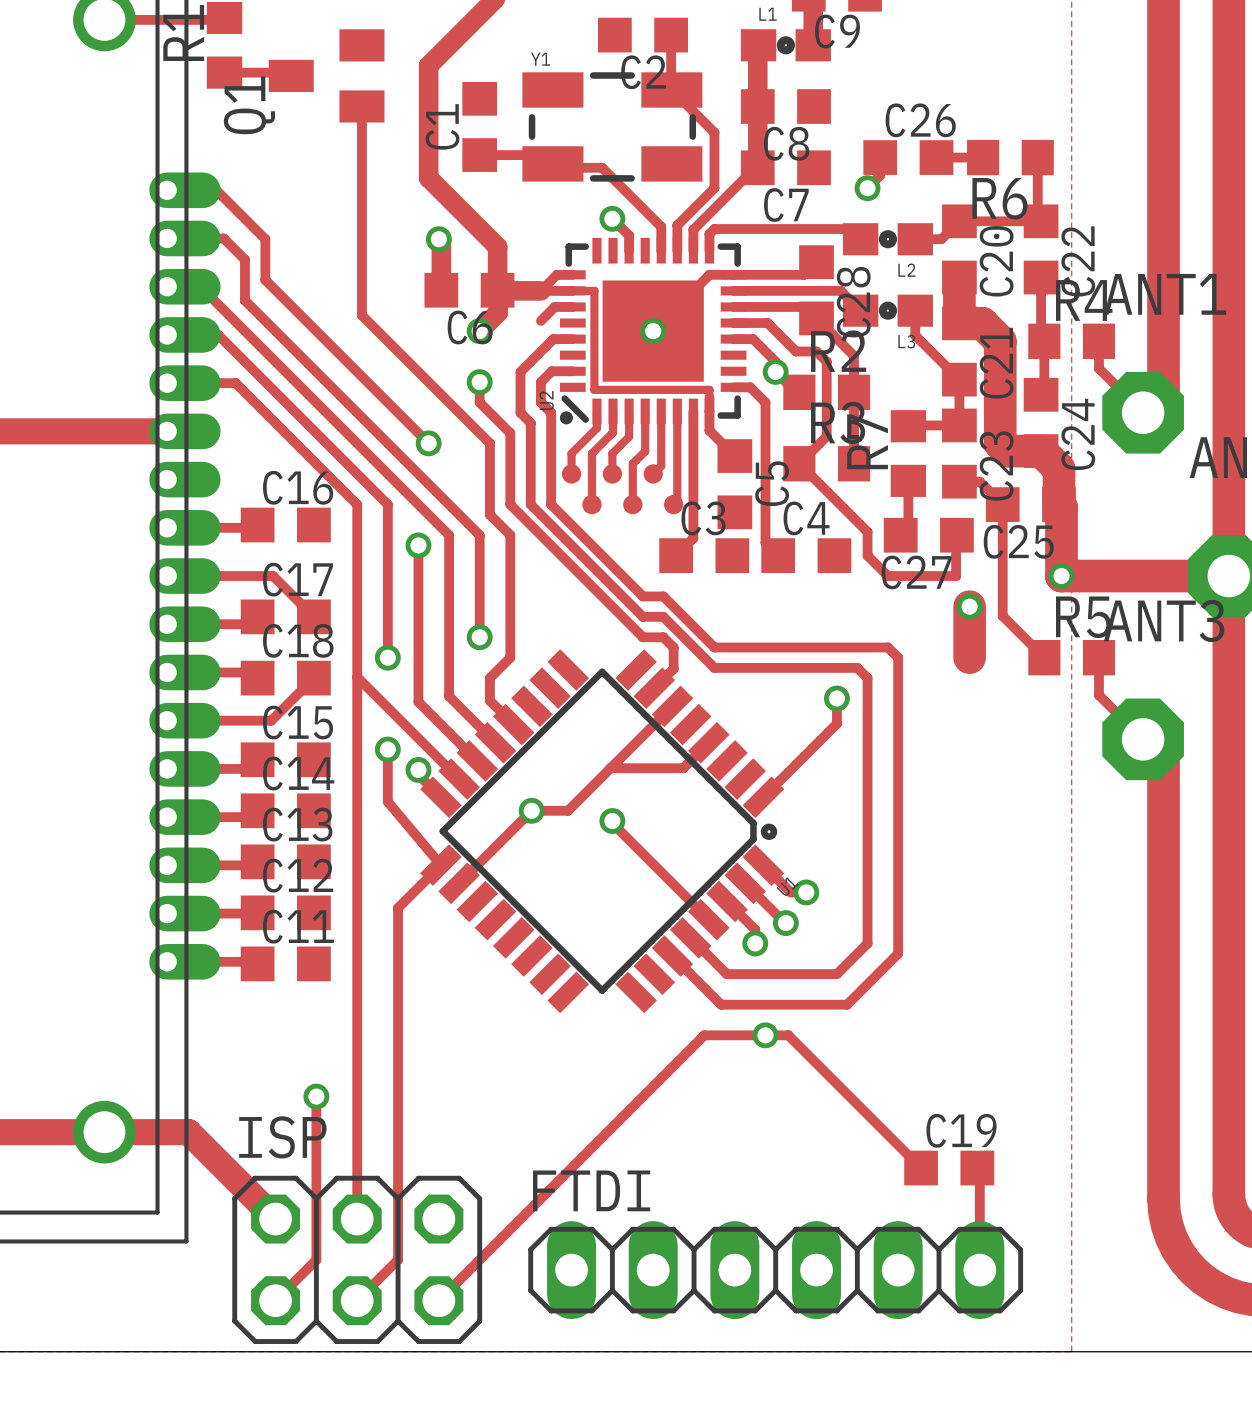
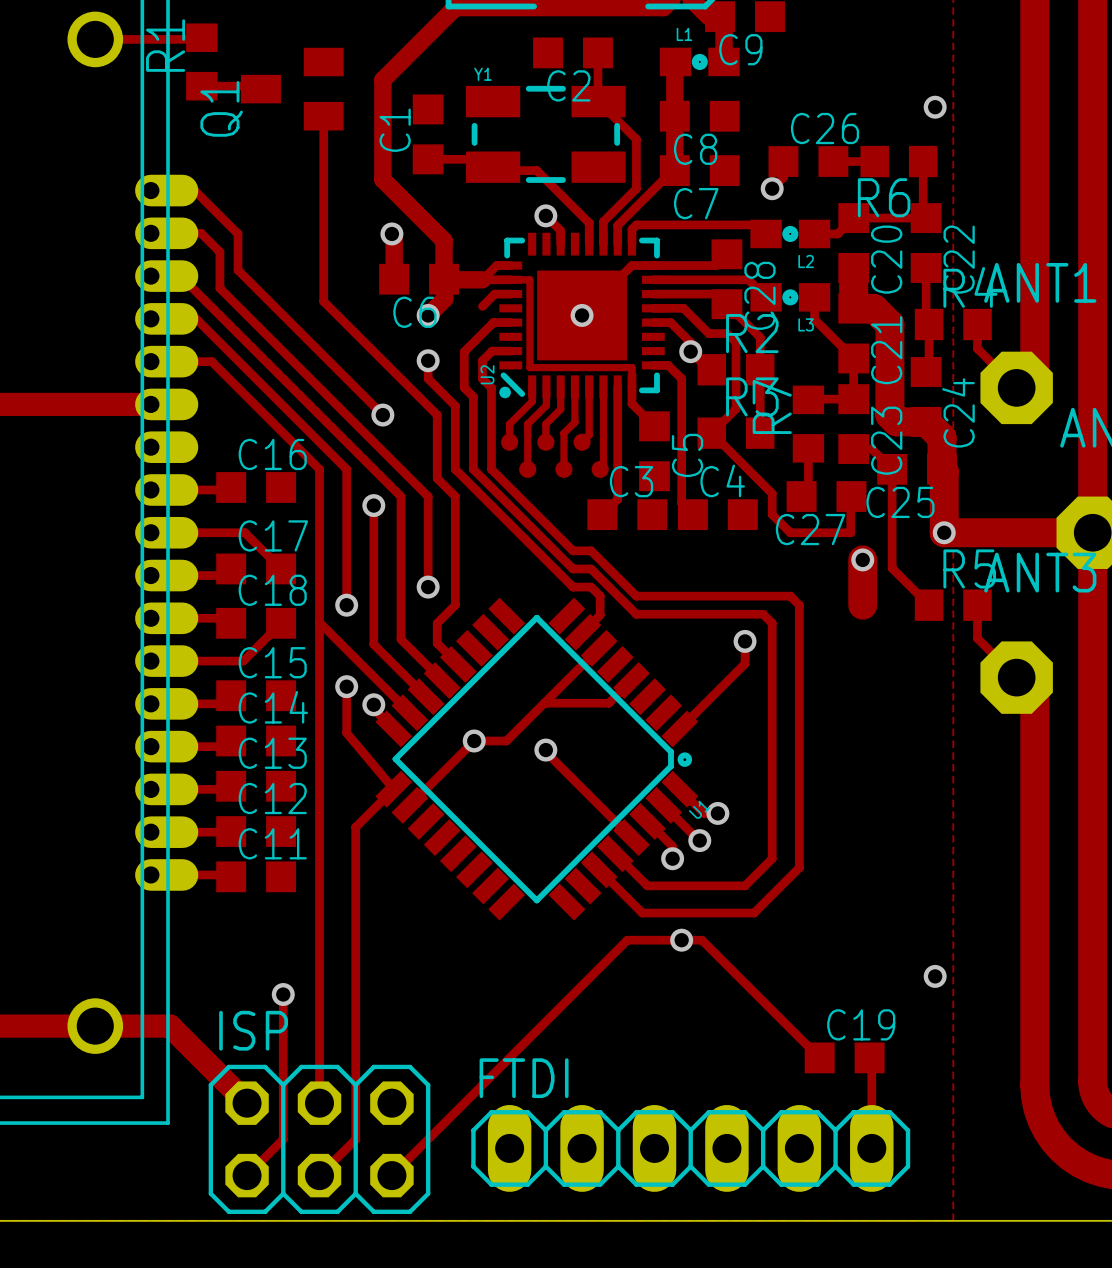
via: none -> (935, 107)
via: none -> (935, 976)

